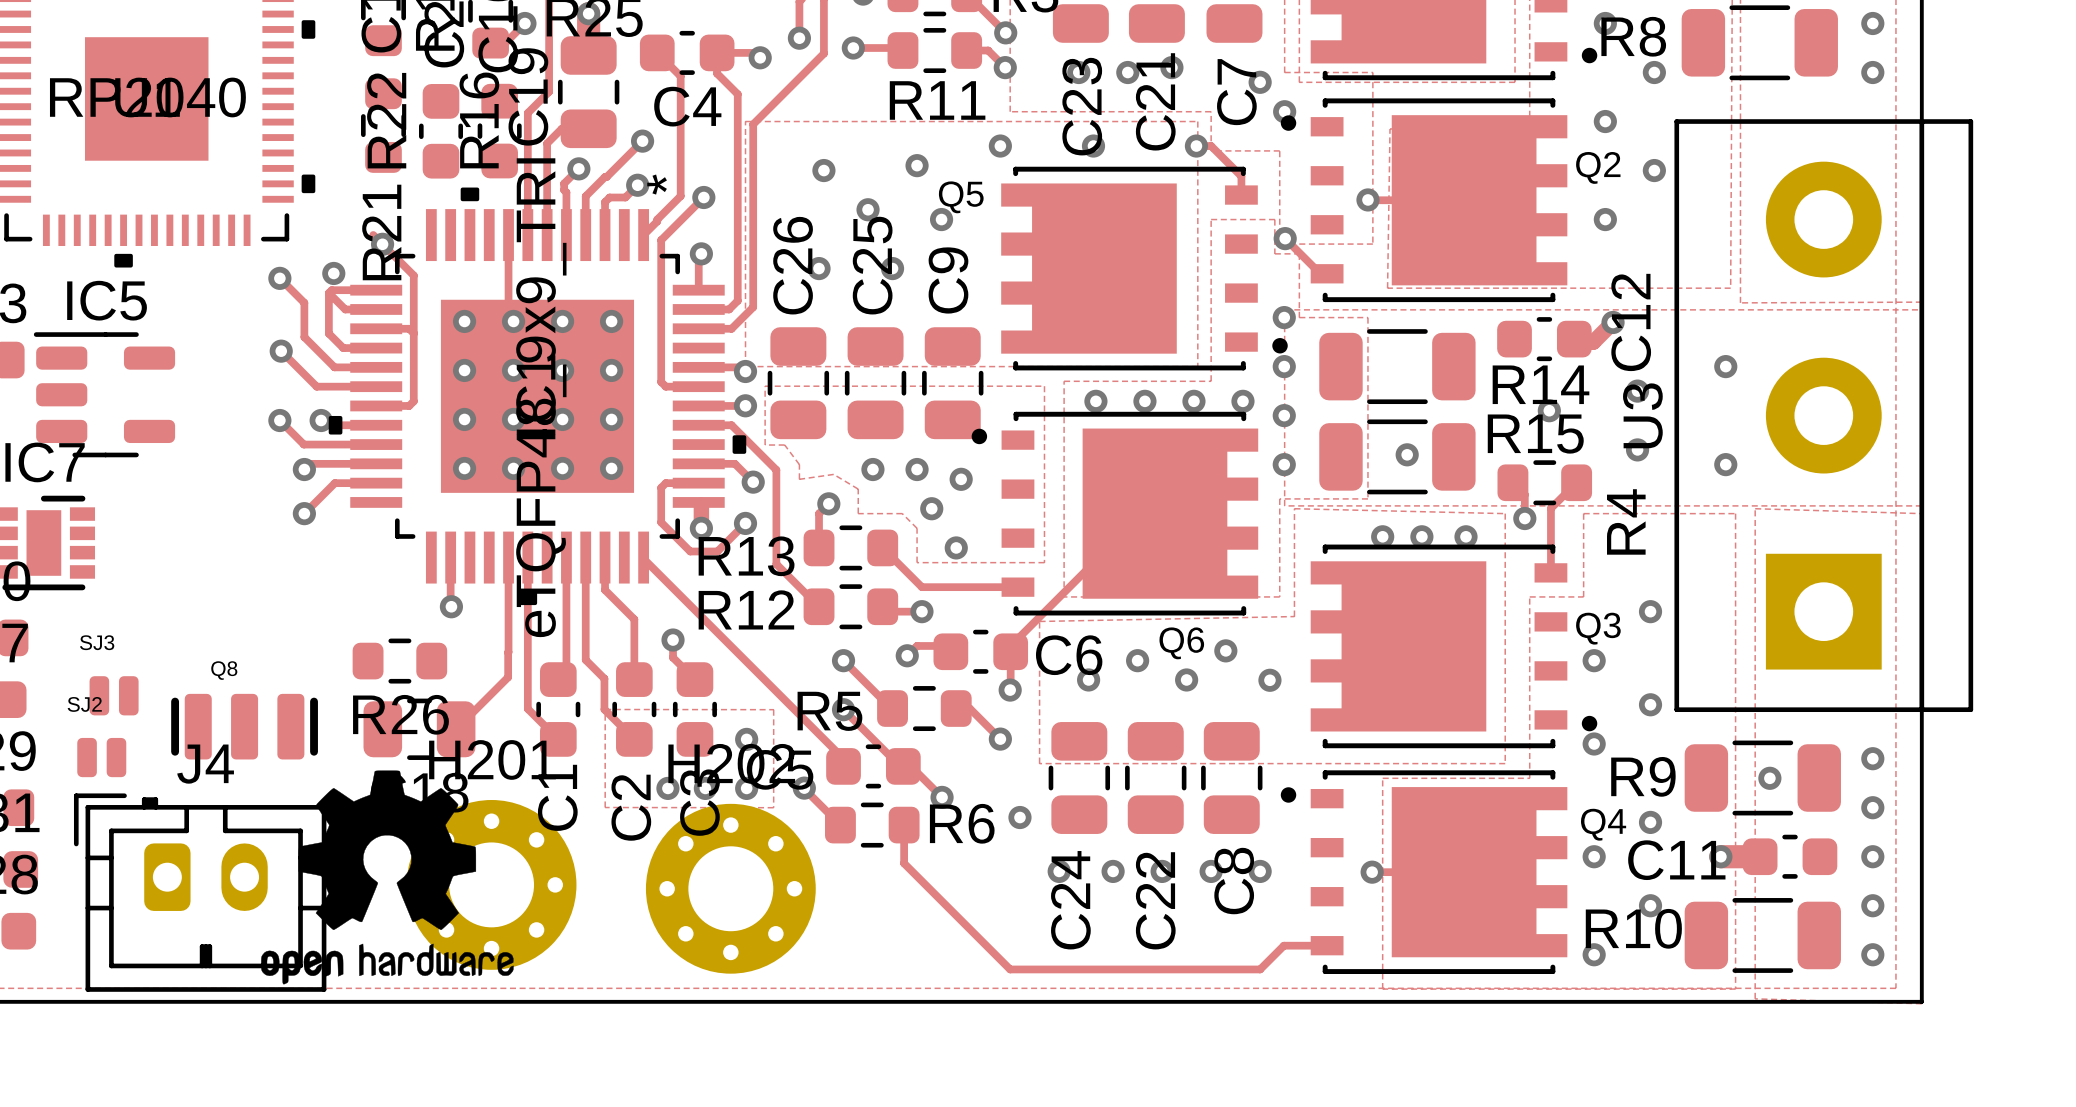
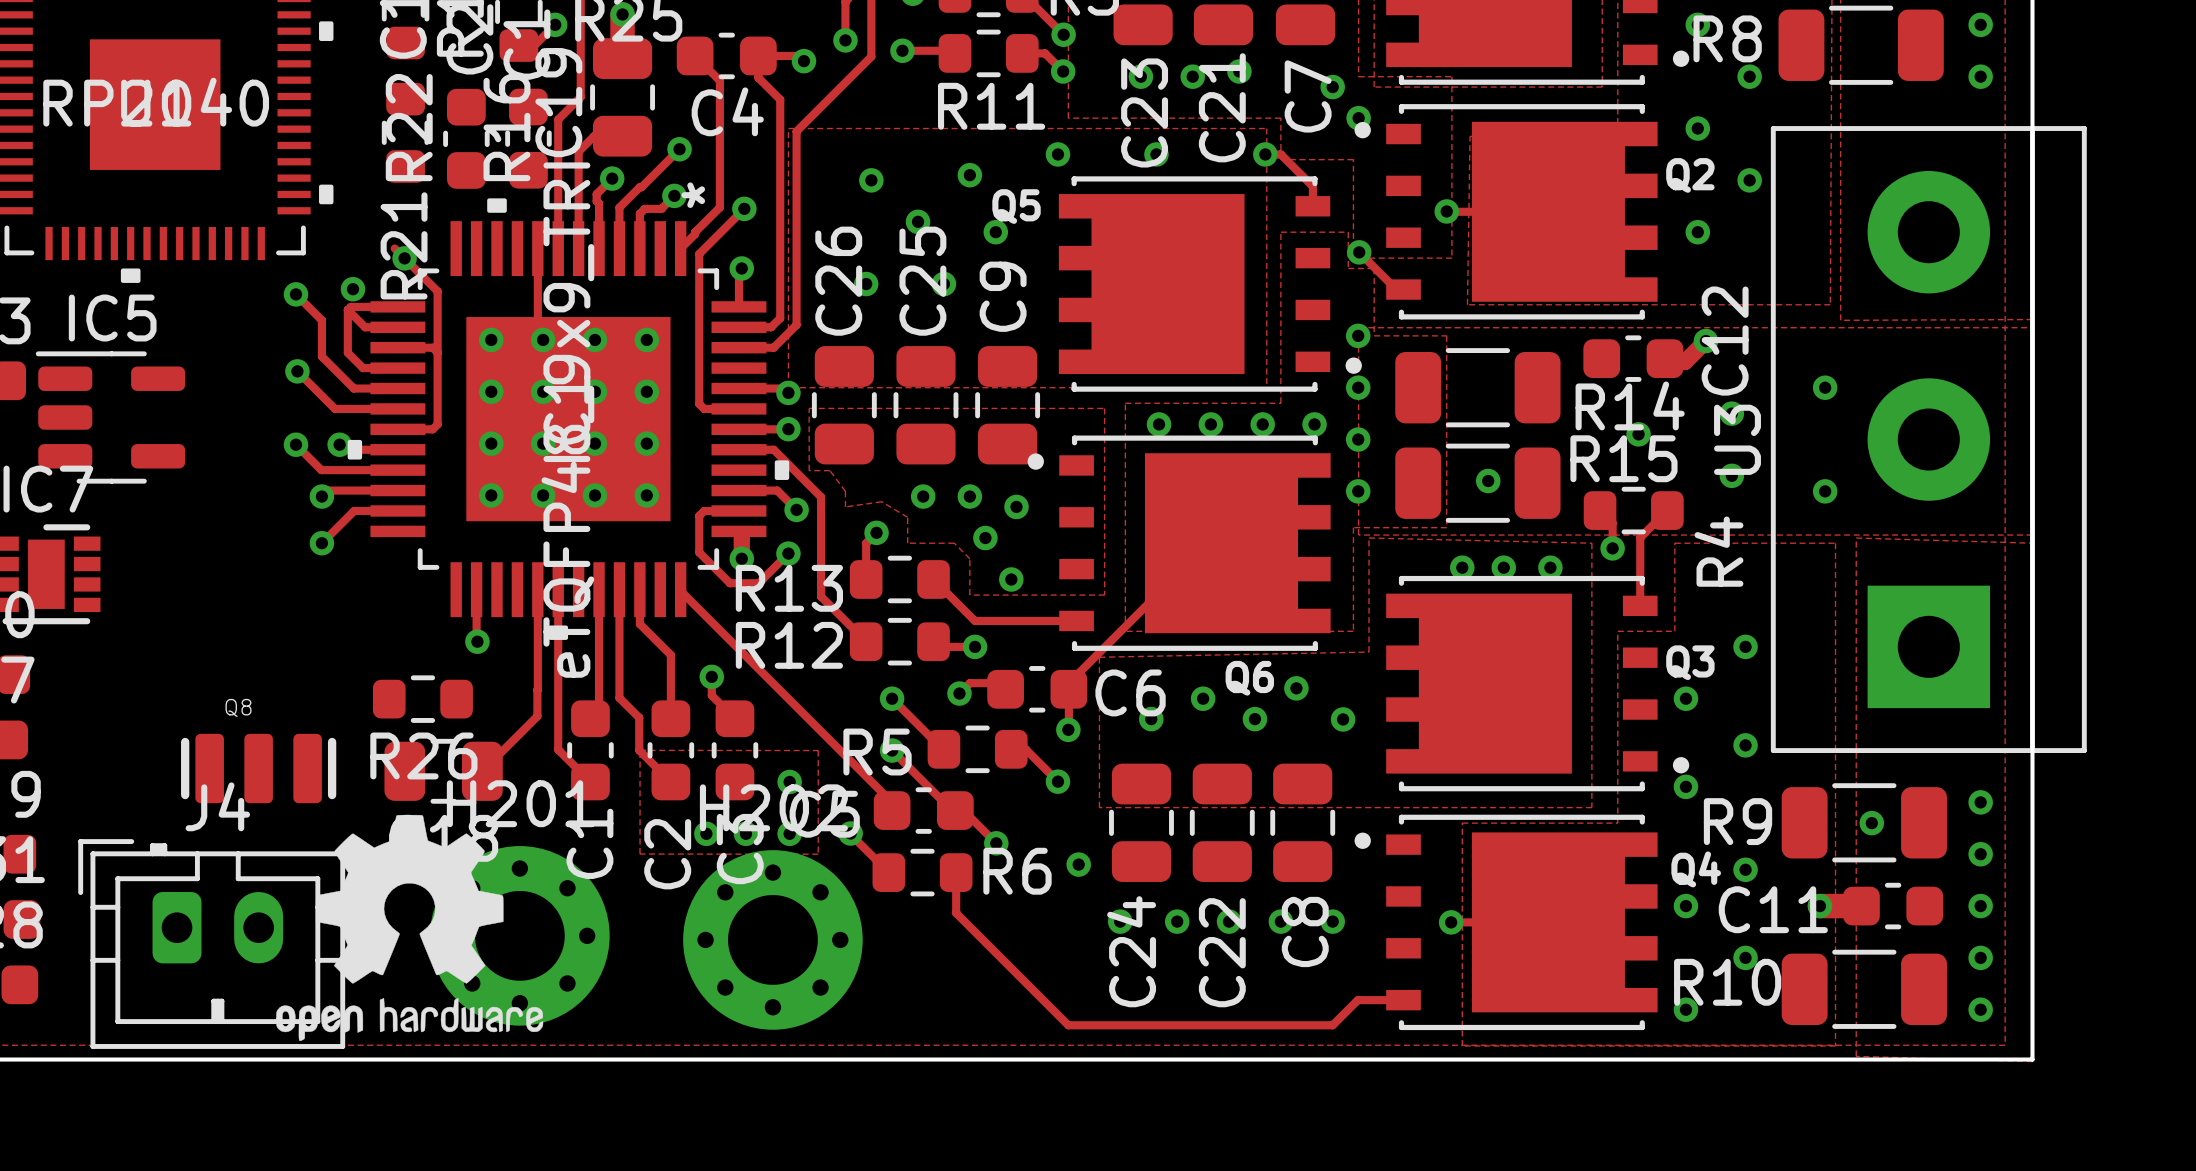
SJ3: (114, 695) -> none
SJ2: (101, 757) -> none

